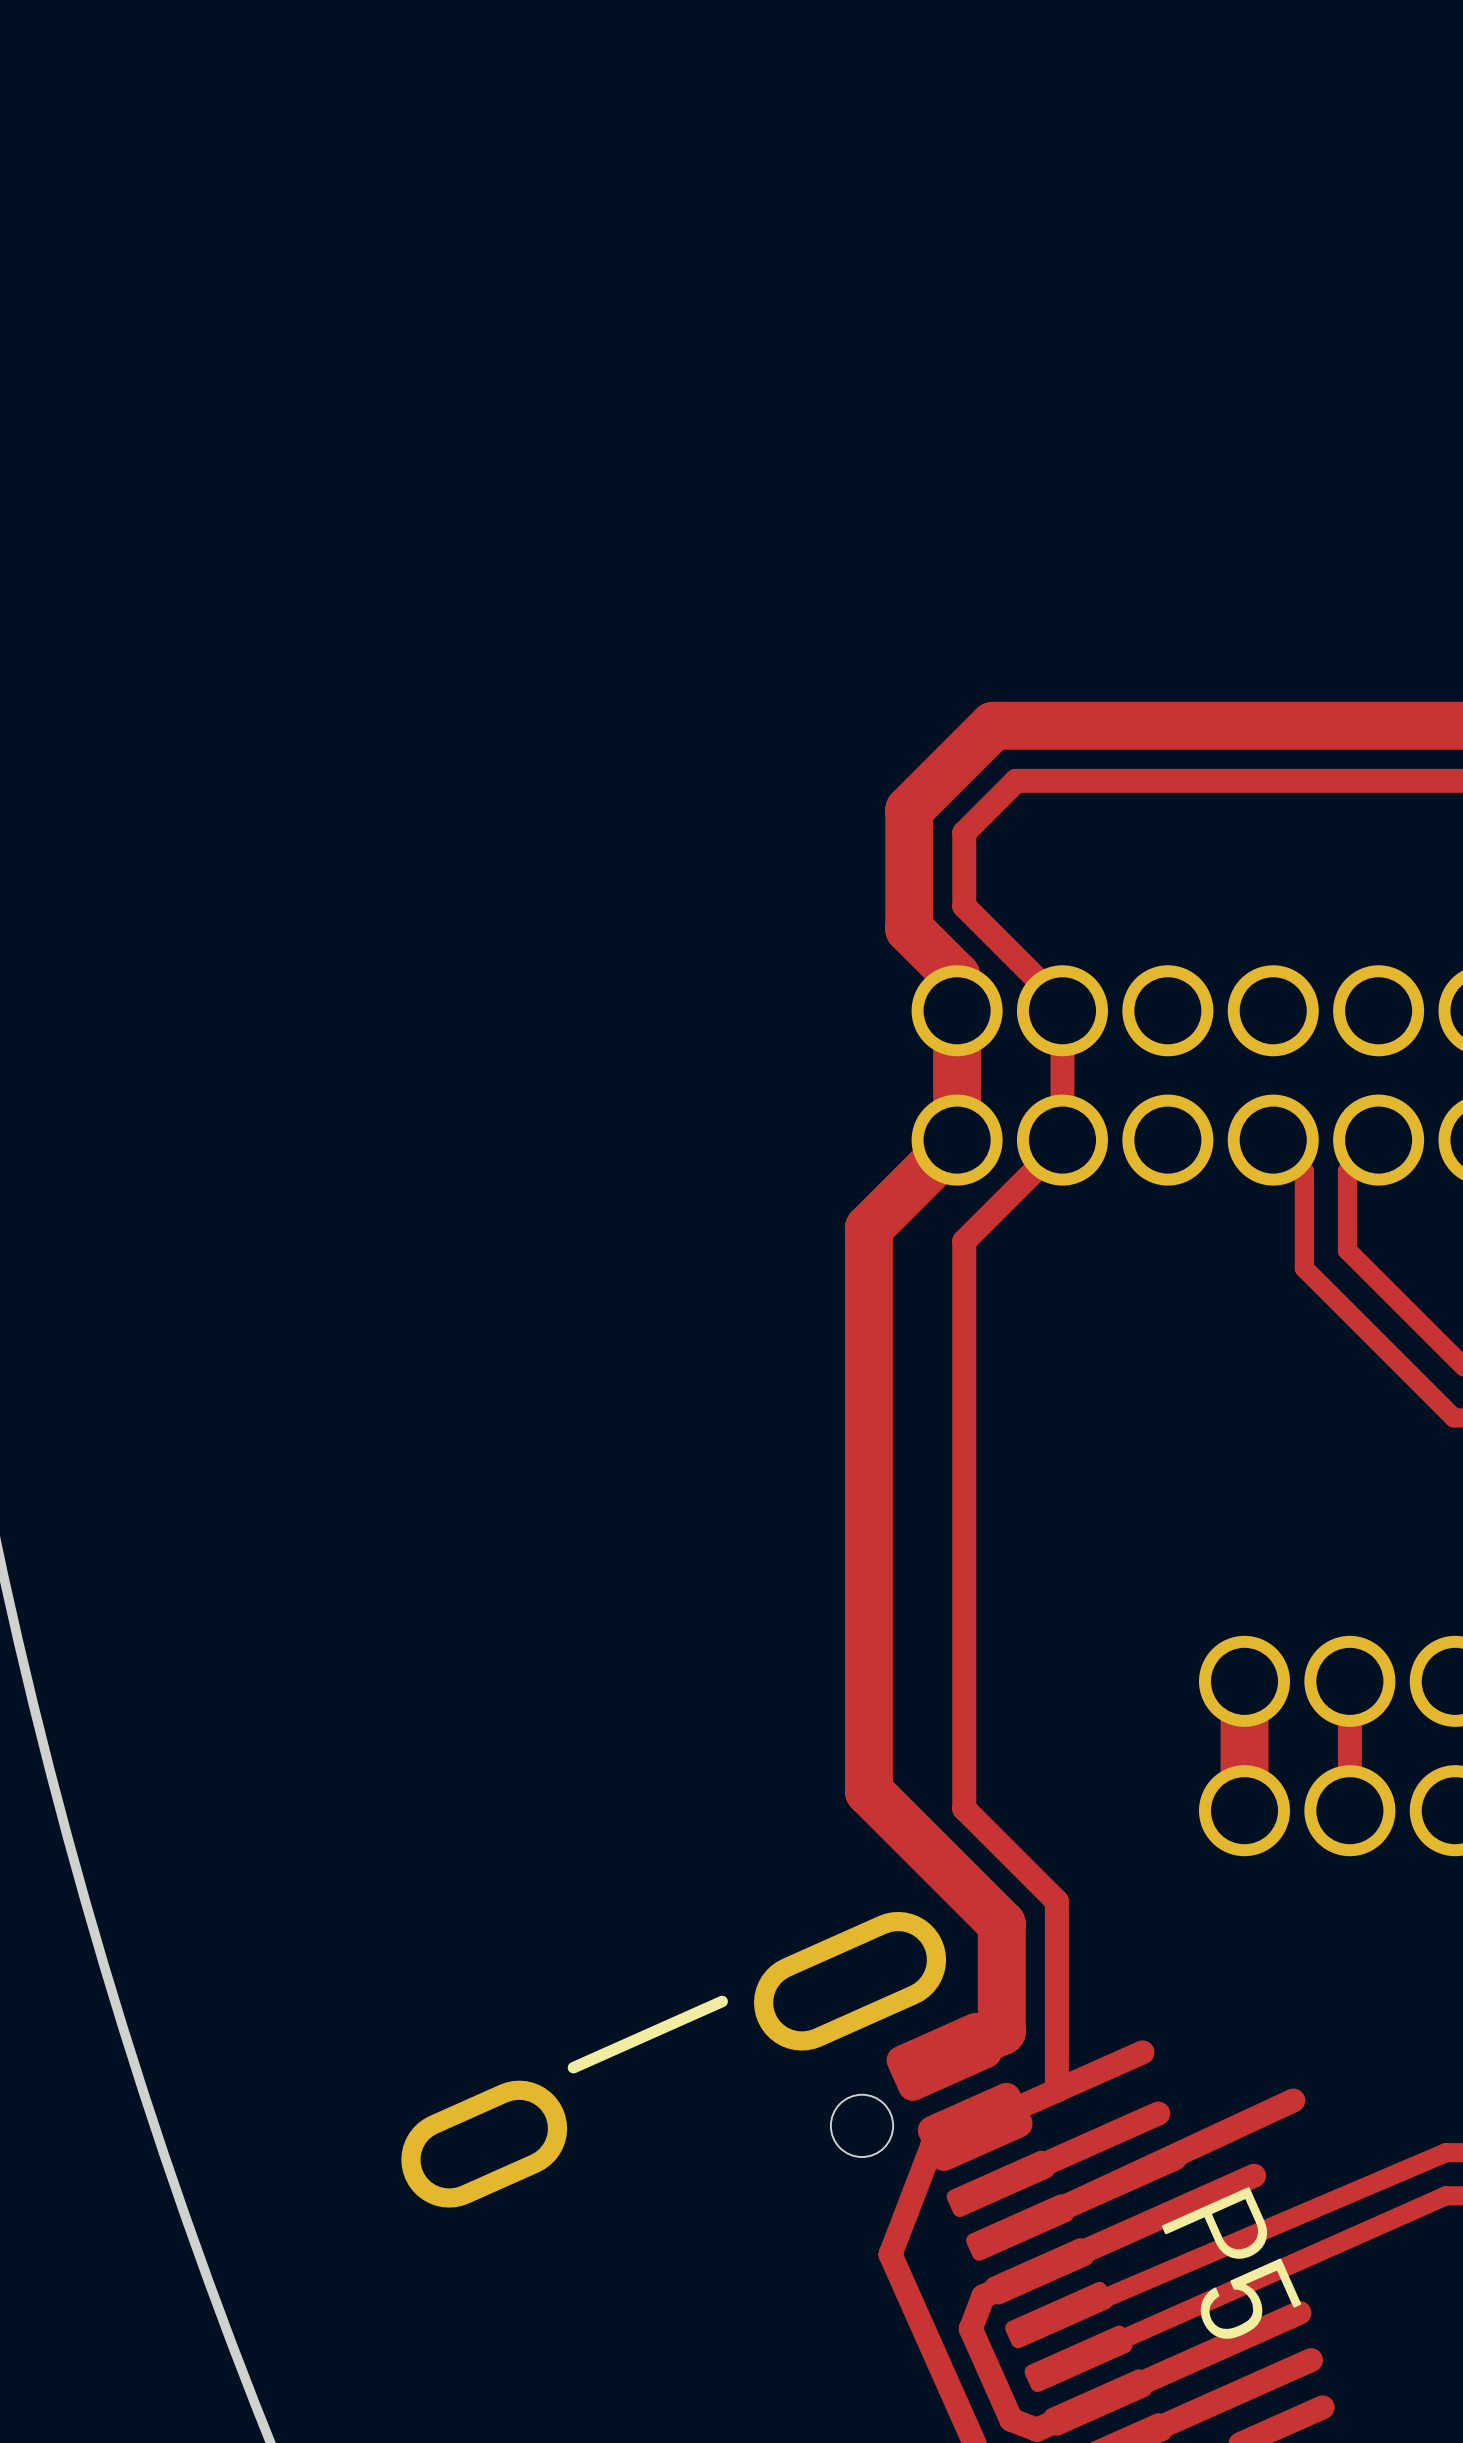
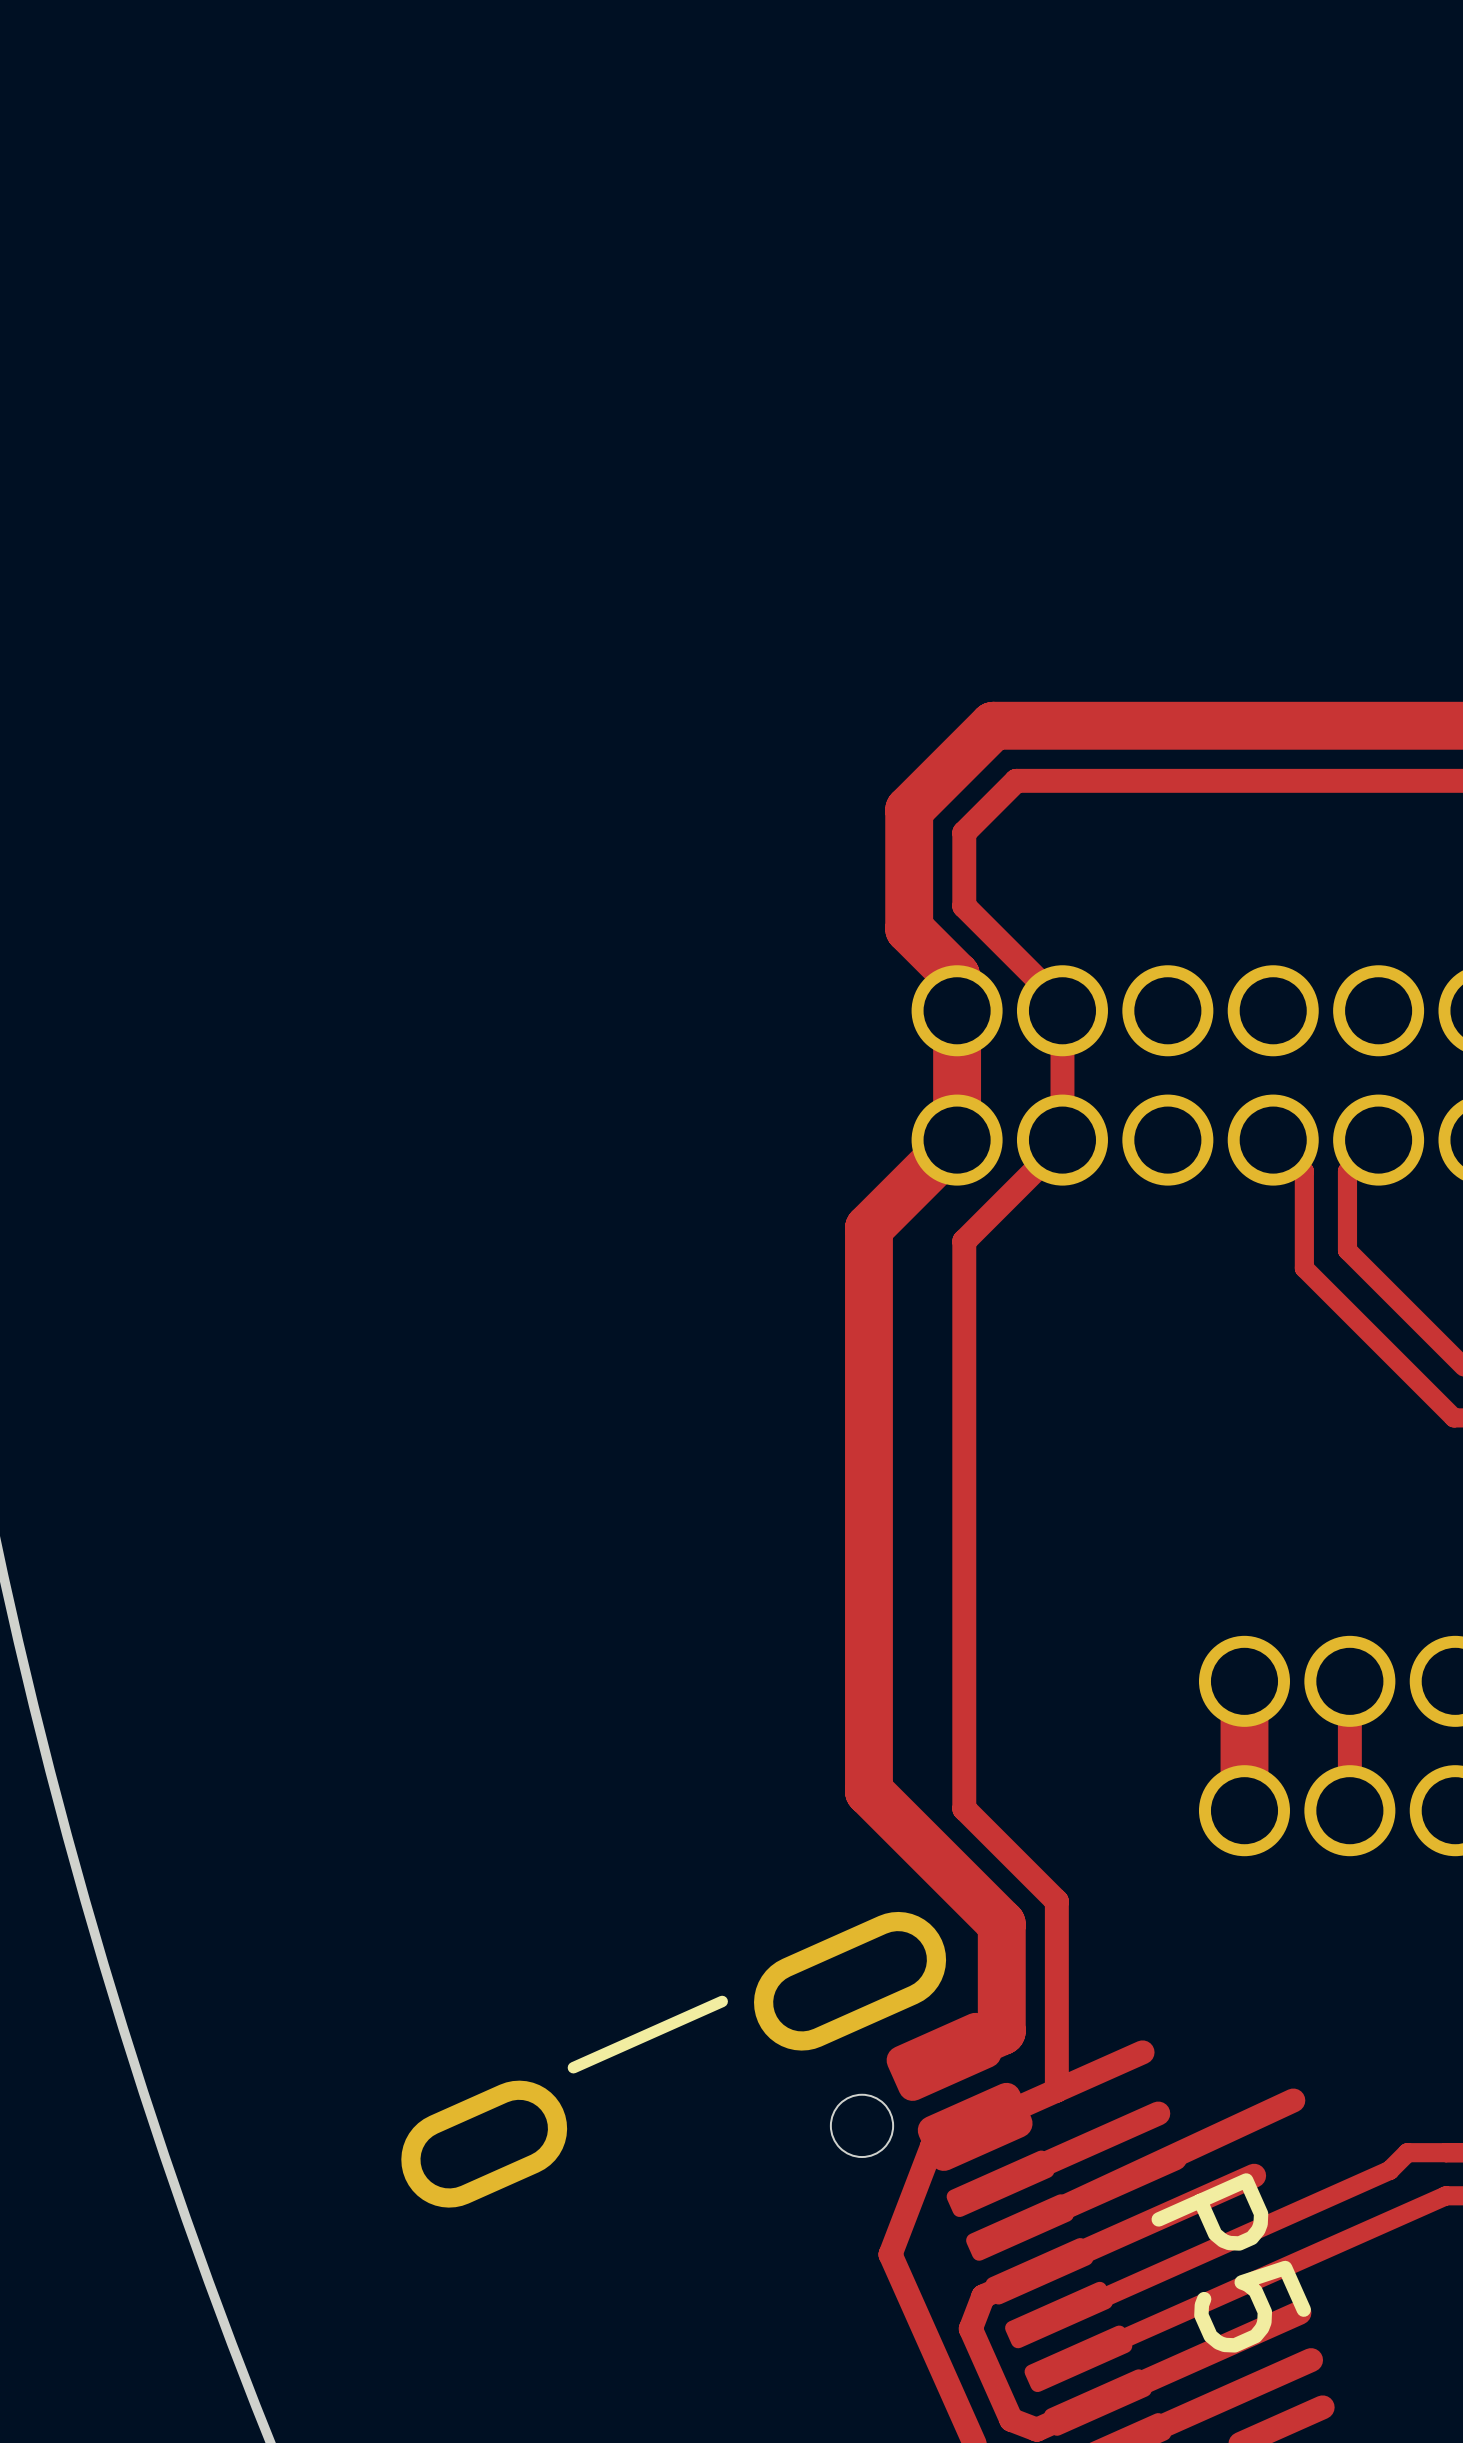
track: (1445, 2152) (1062, 2316) -> (1445, 2152) (1407, 2152) (1389, 2170) (1062, 2316)

